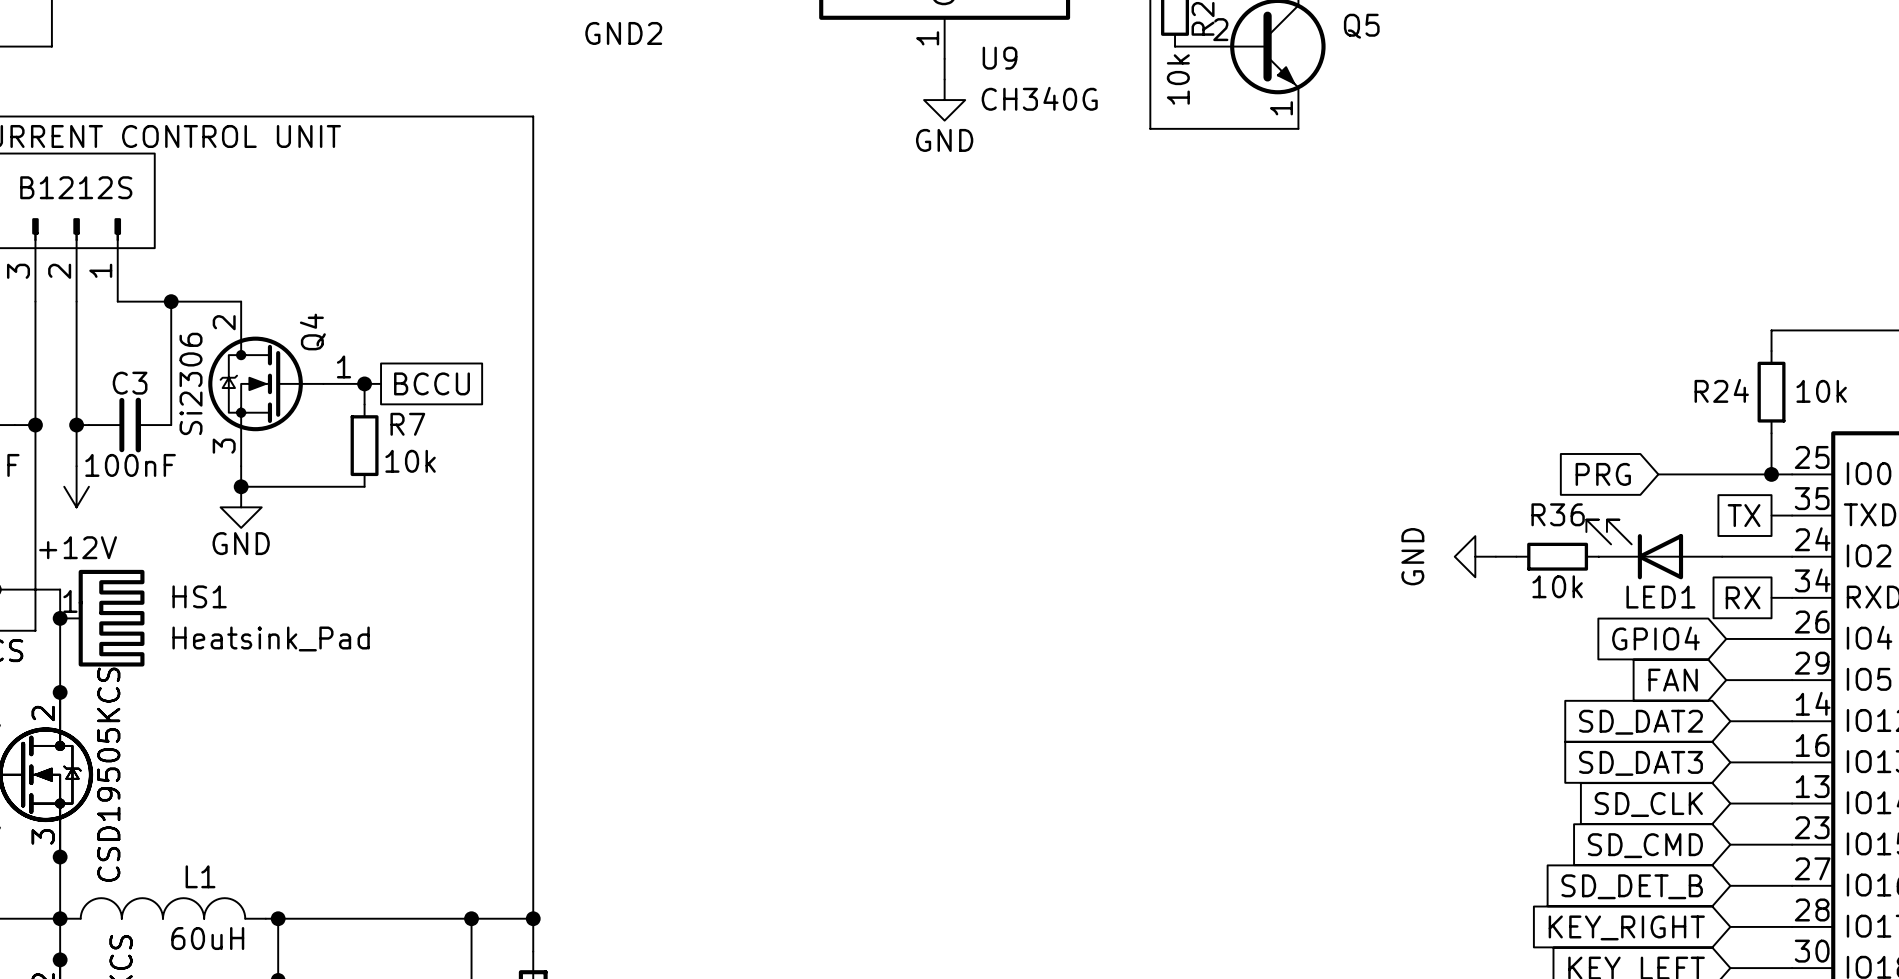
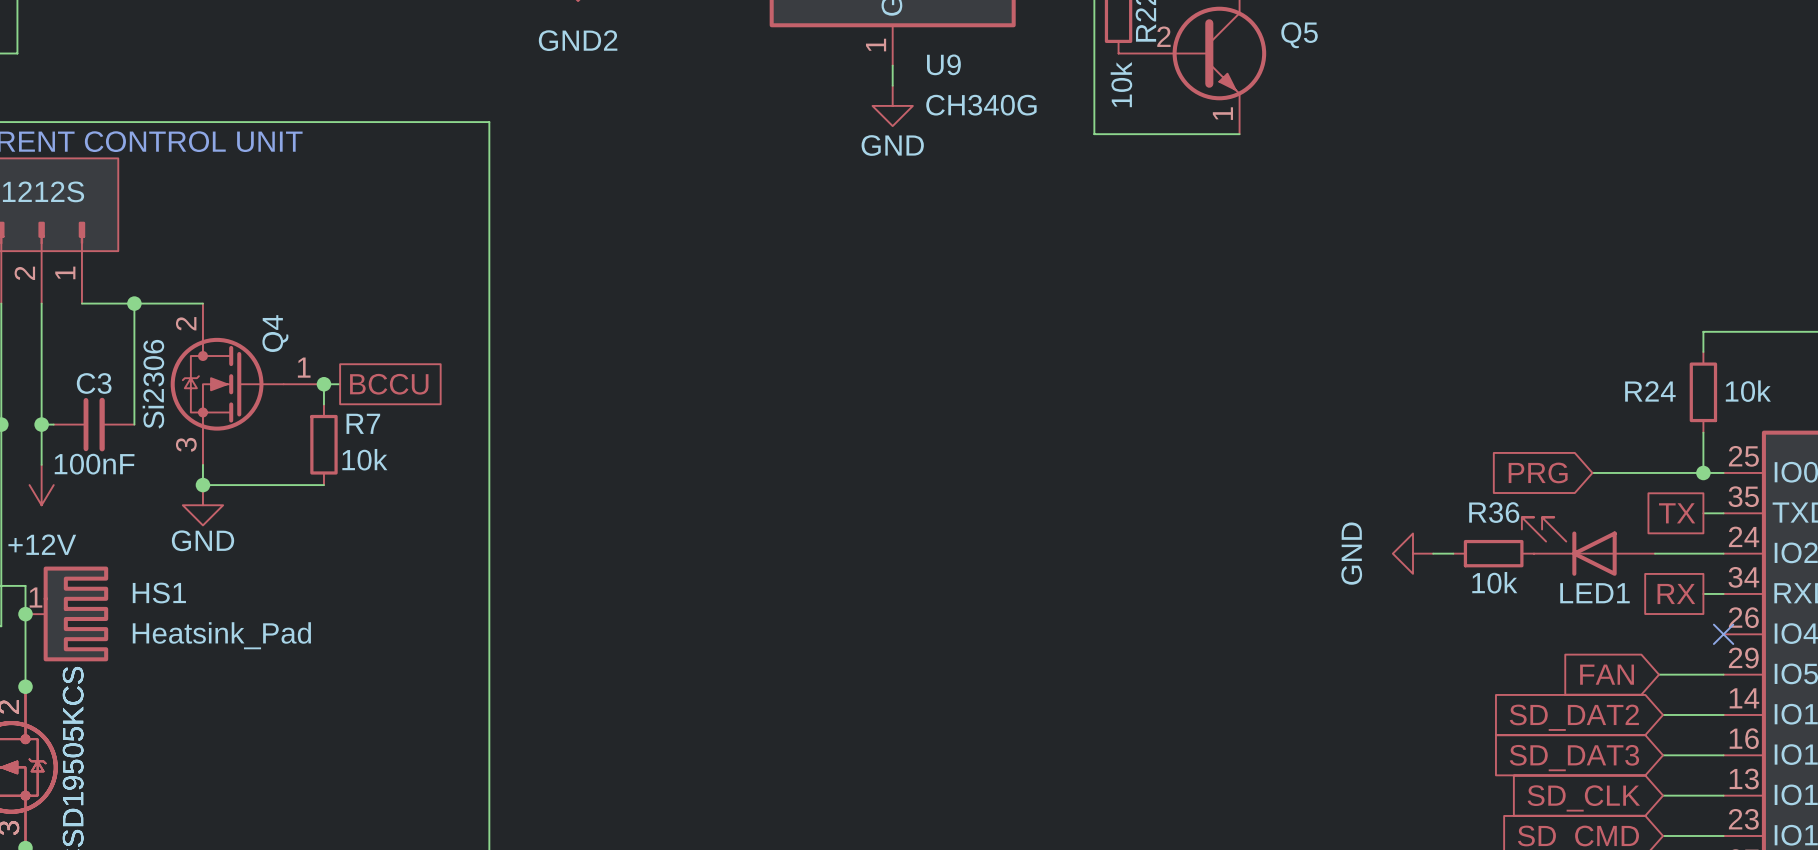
global label: GPIO4 (1655, 638) -> none
wire: (1726, 638) (1792, 638) -> none
no-connect mark: none -> (1723, 634)

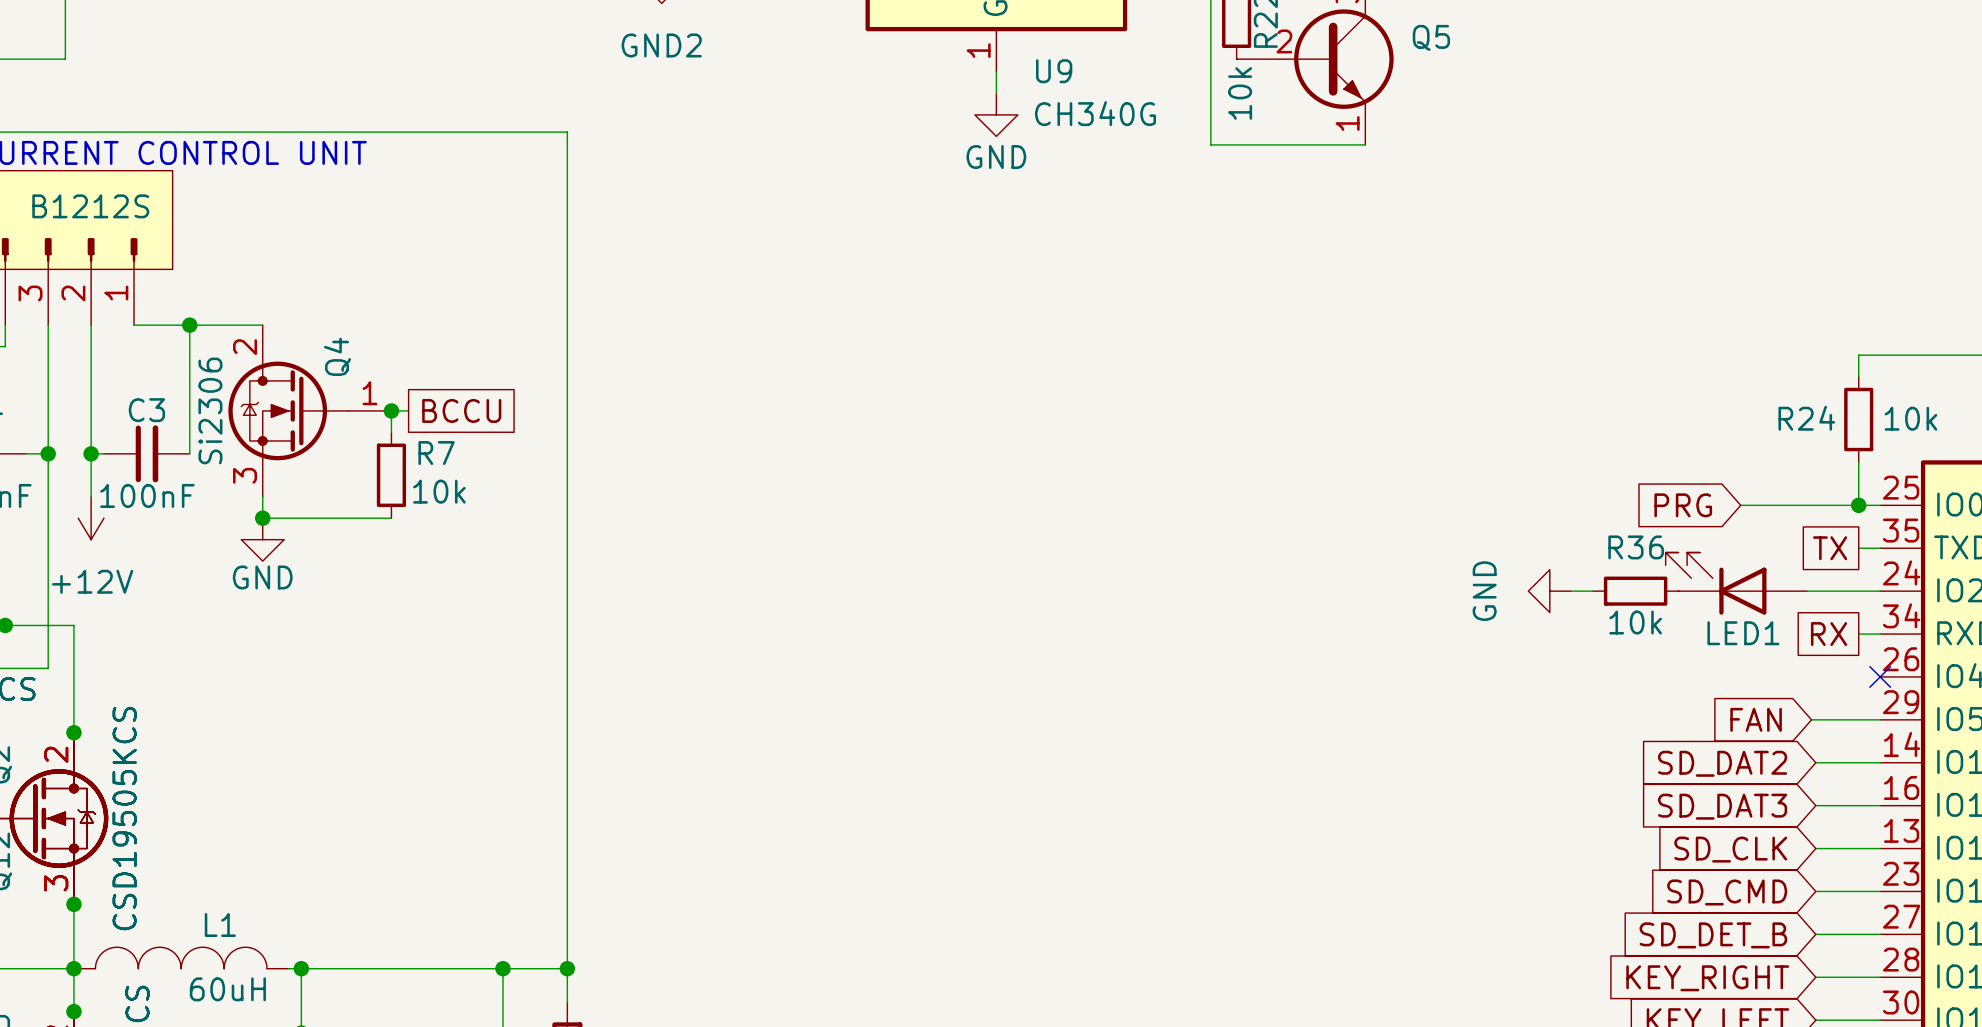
HS1: Heatsink_Pad (66, 613) -> none
junction: (25, 614) -> none

